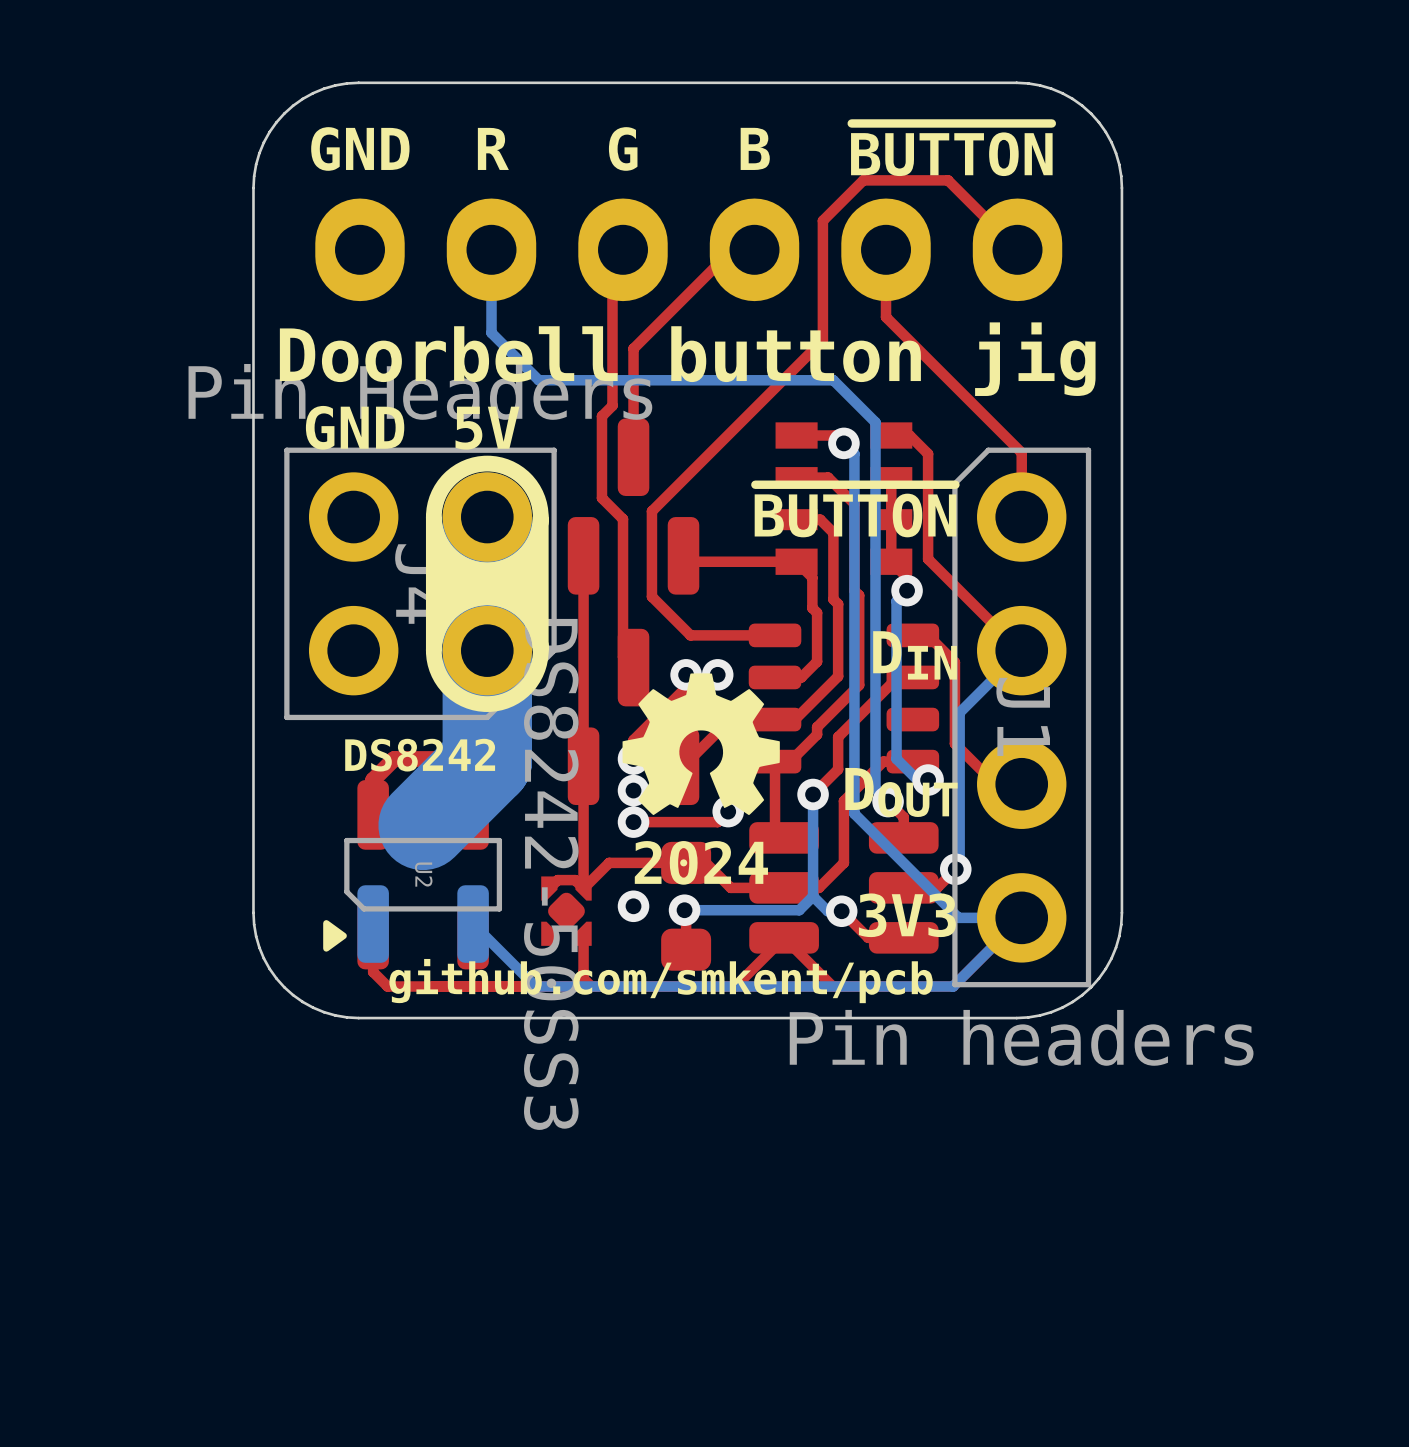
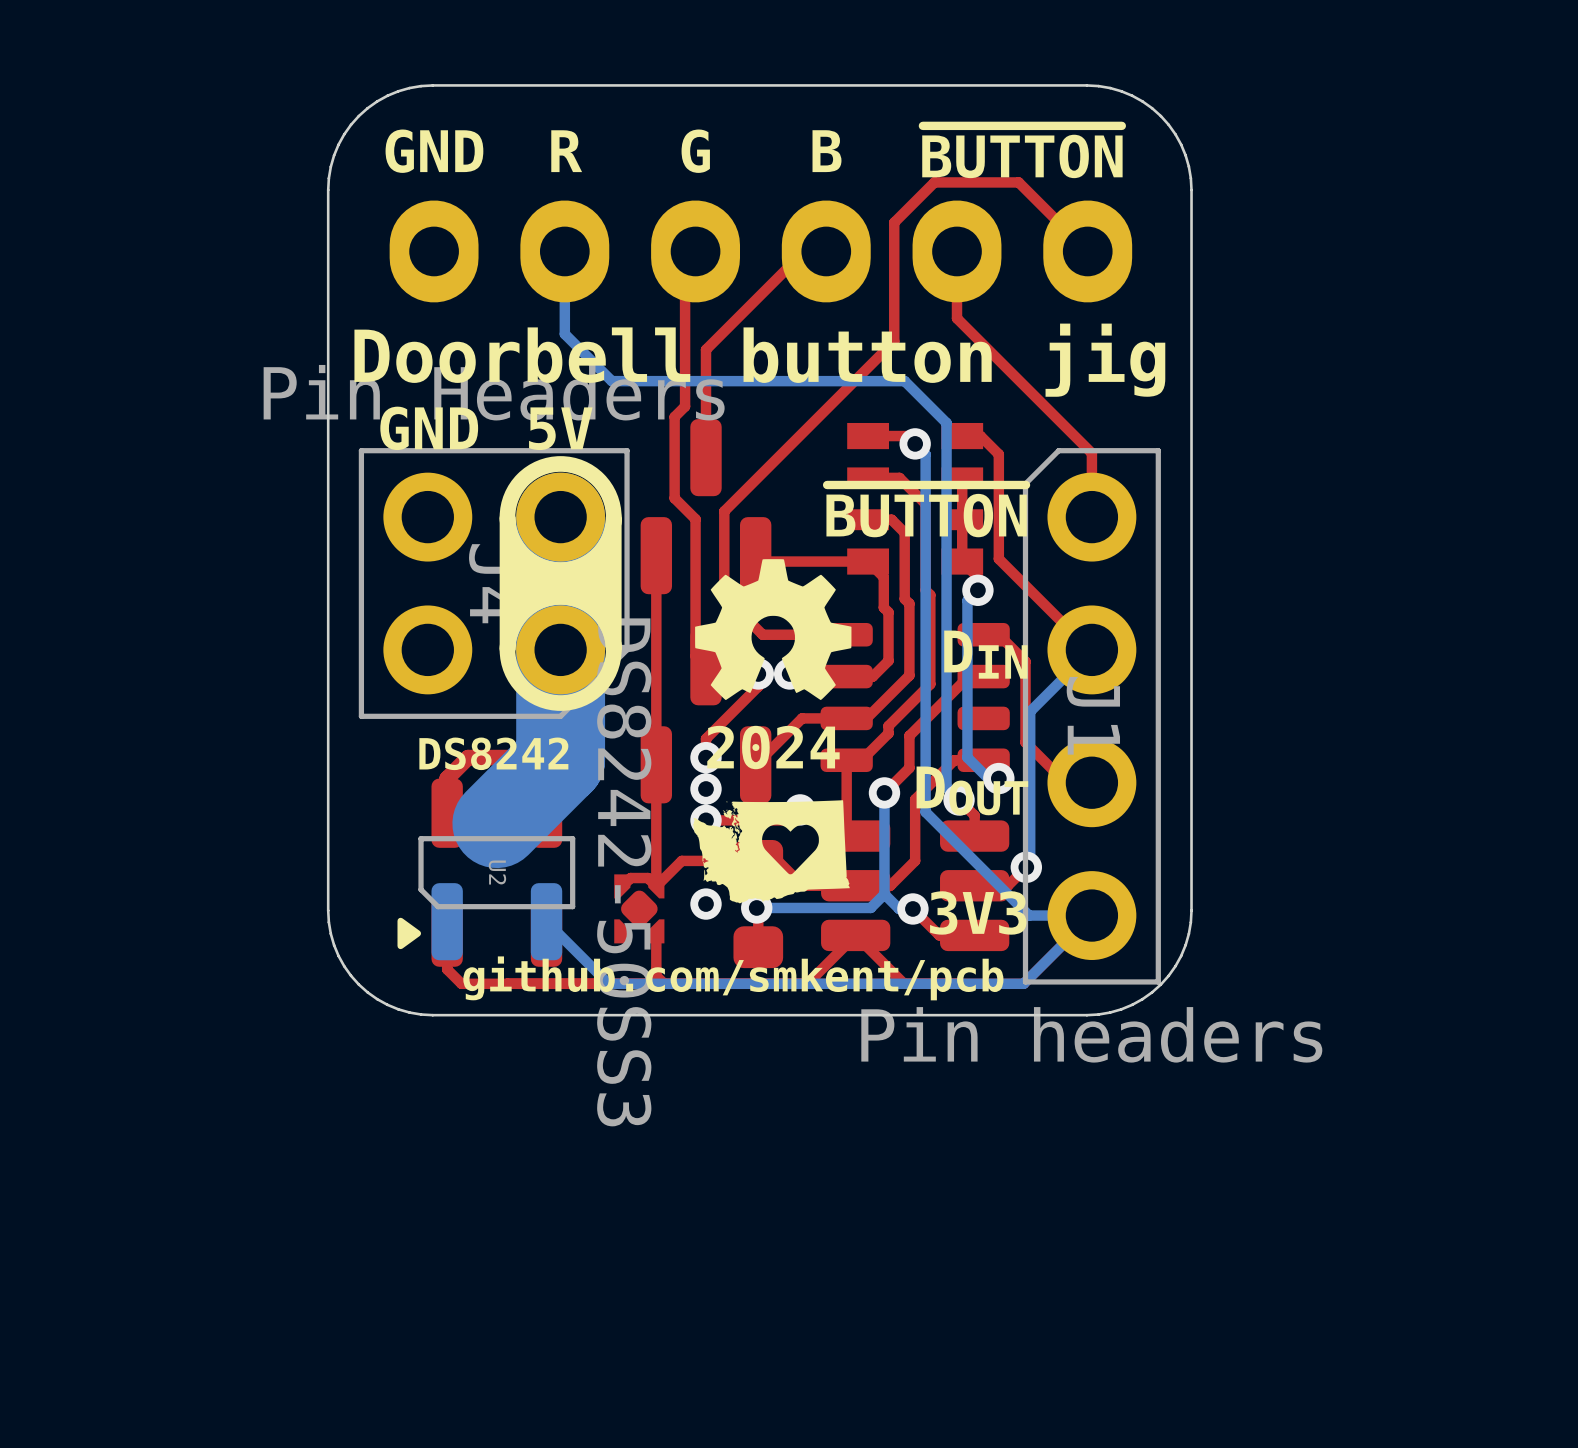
drawing position: (701, 744) -> (773, 629)
drawing: none -> [692, 800, 850, 904]
text position: 2024 (701, 862) -> 2024 (773, 747)

